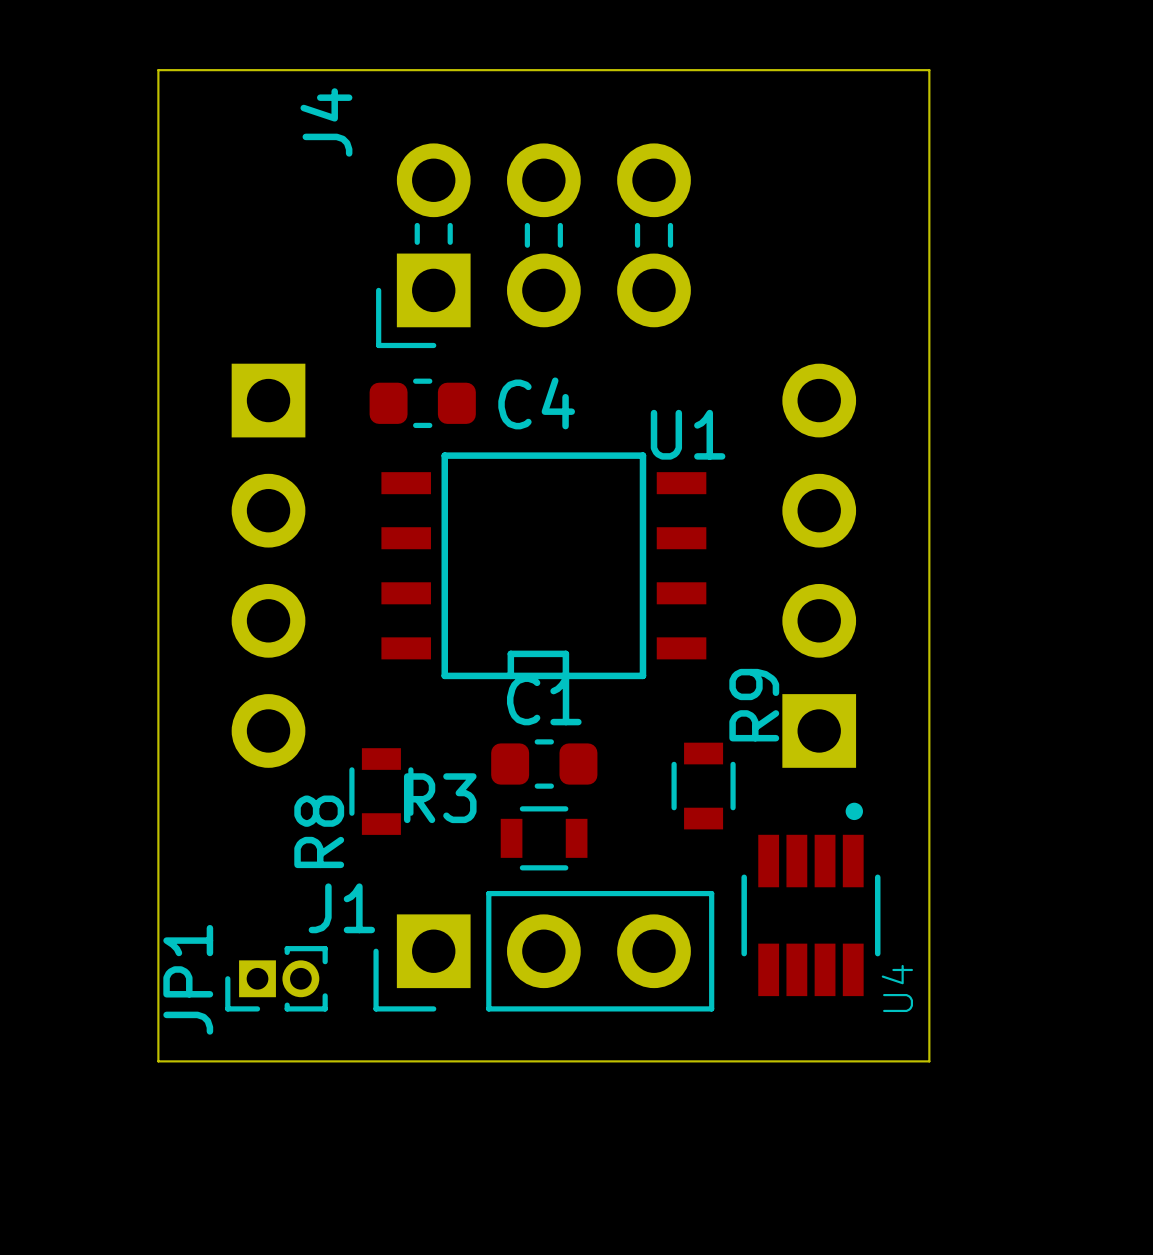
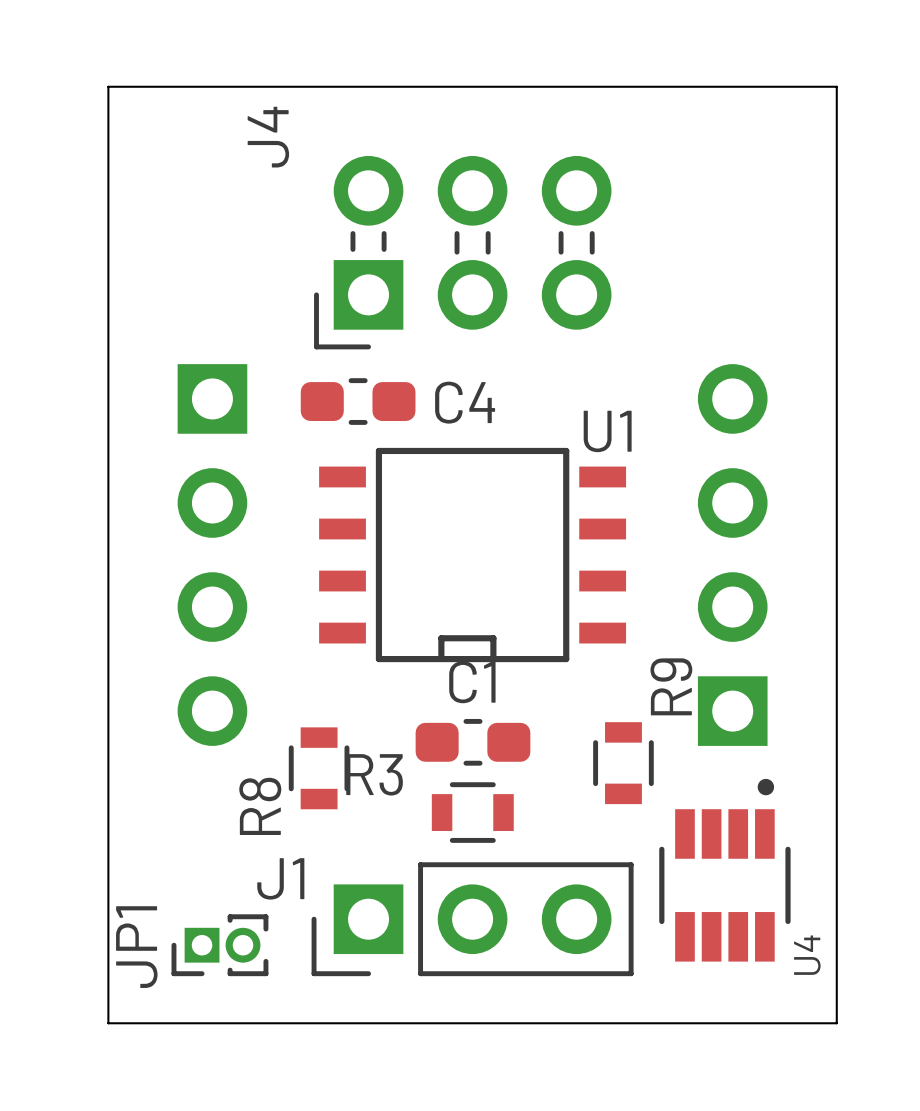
C4 footprint: [369, 378, 476, 429] -> [300, 378, 416, 425]
C1 footprint: [491, 739, 598, 789] -> [415, 718, 531, 766]

